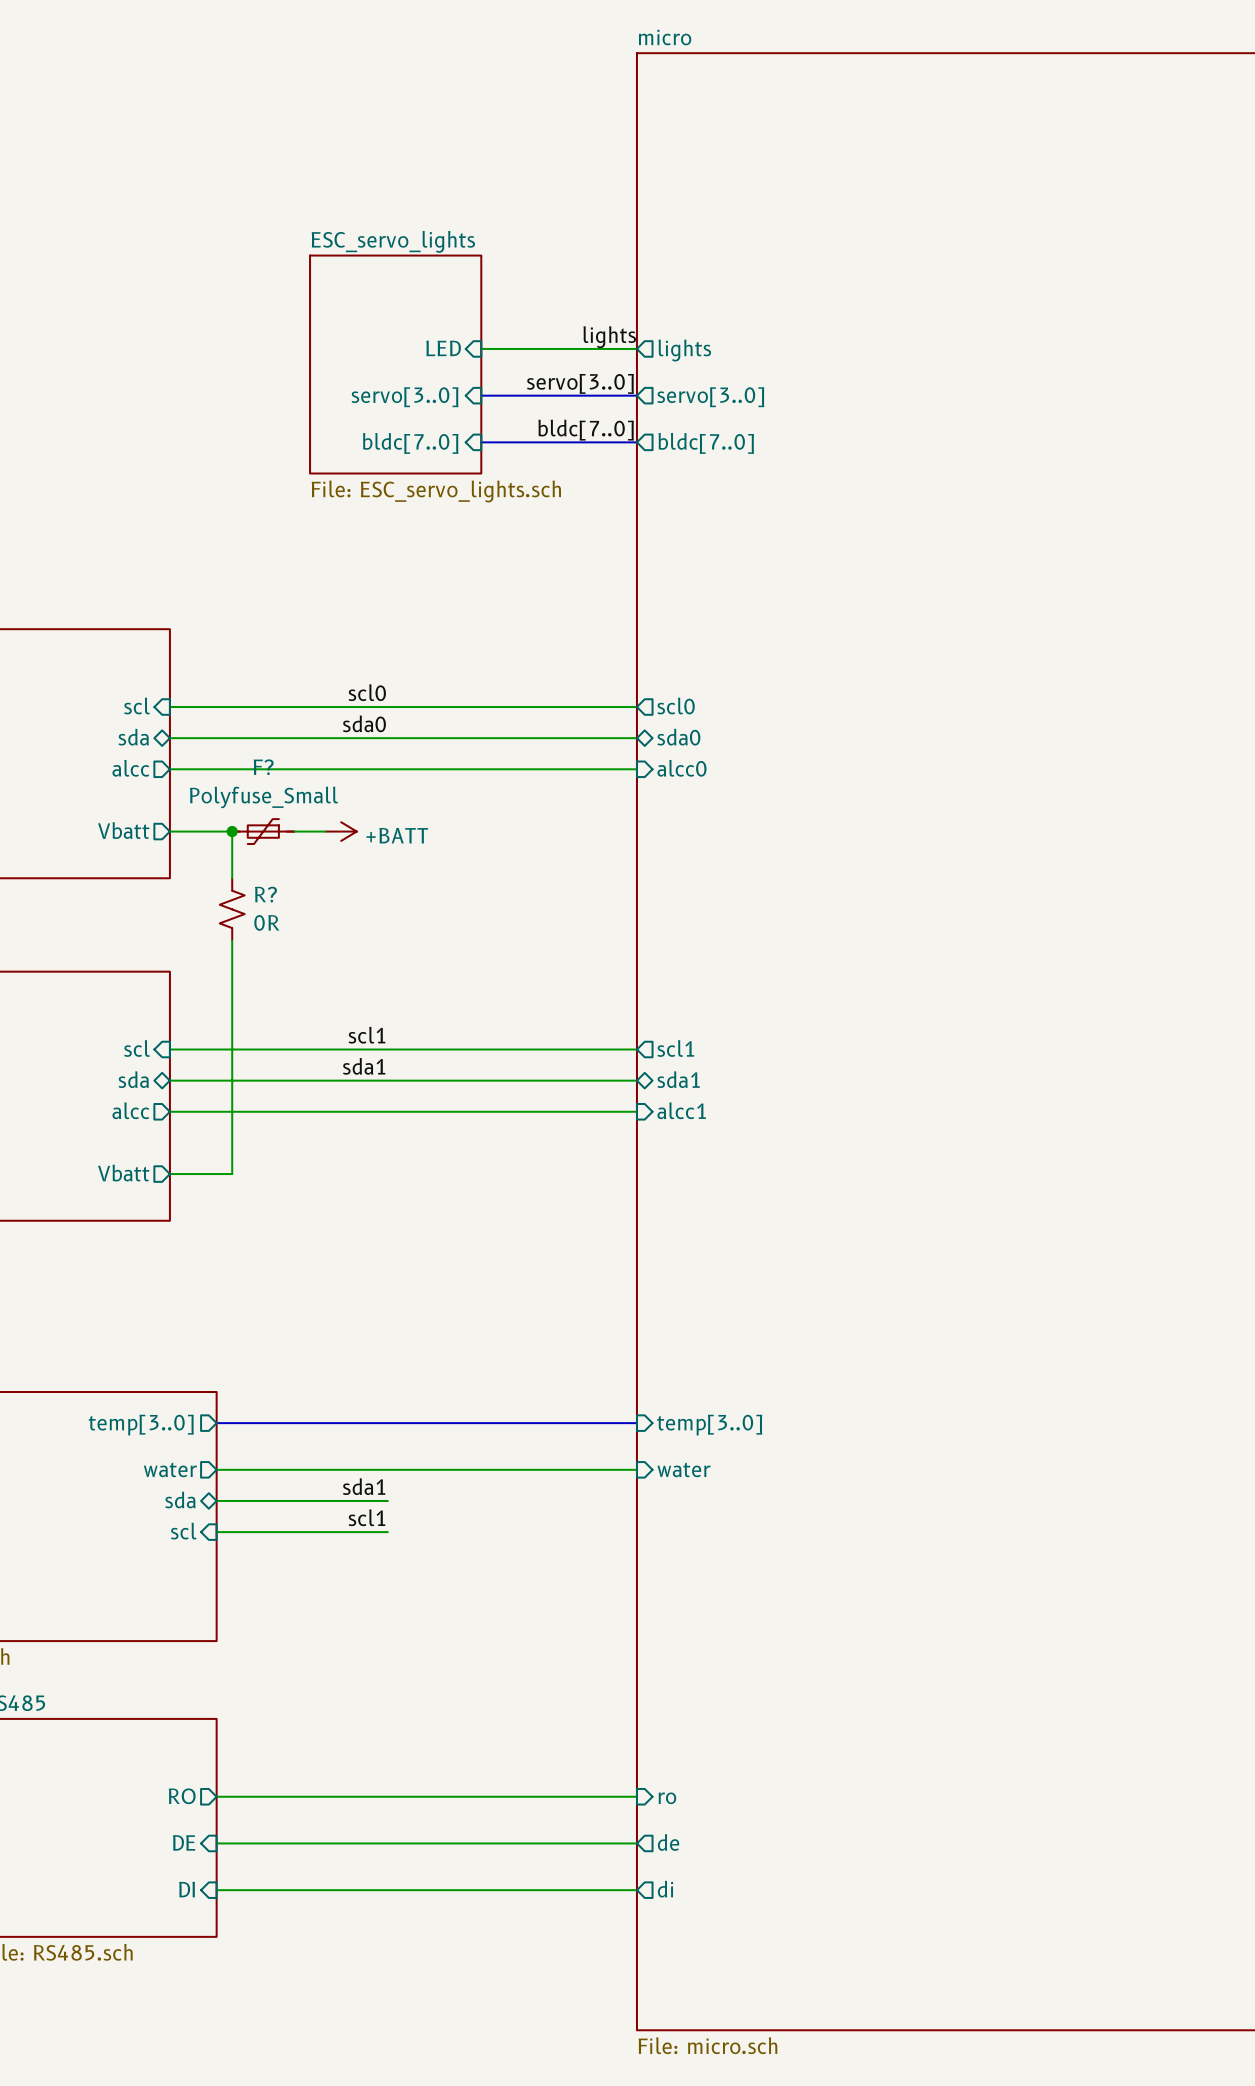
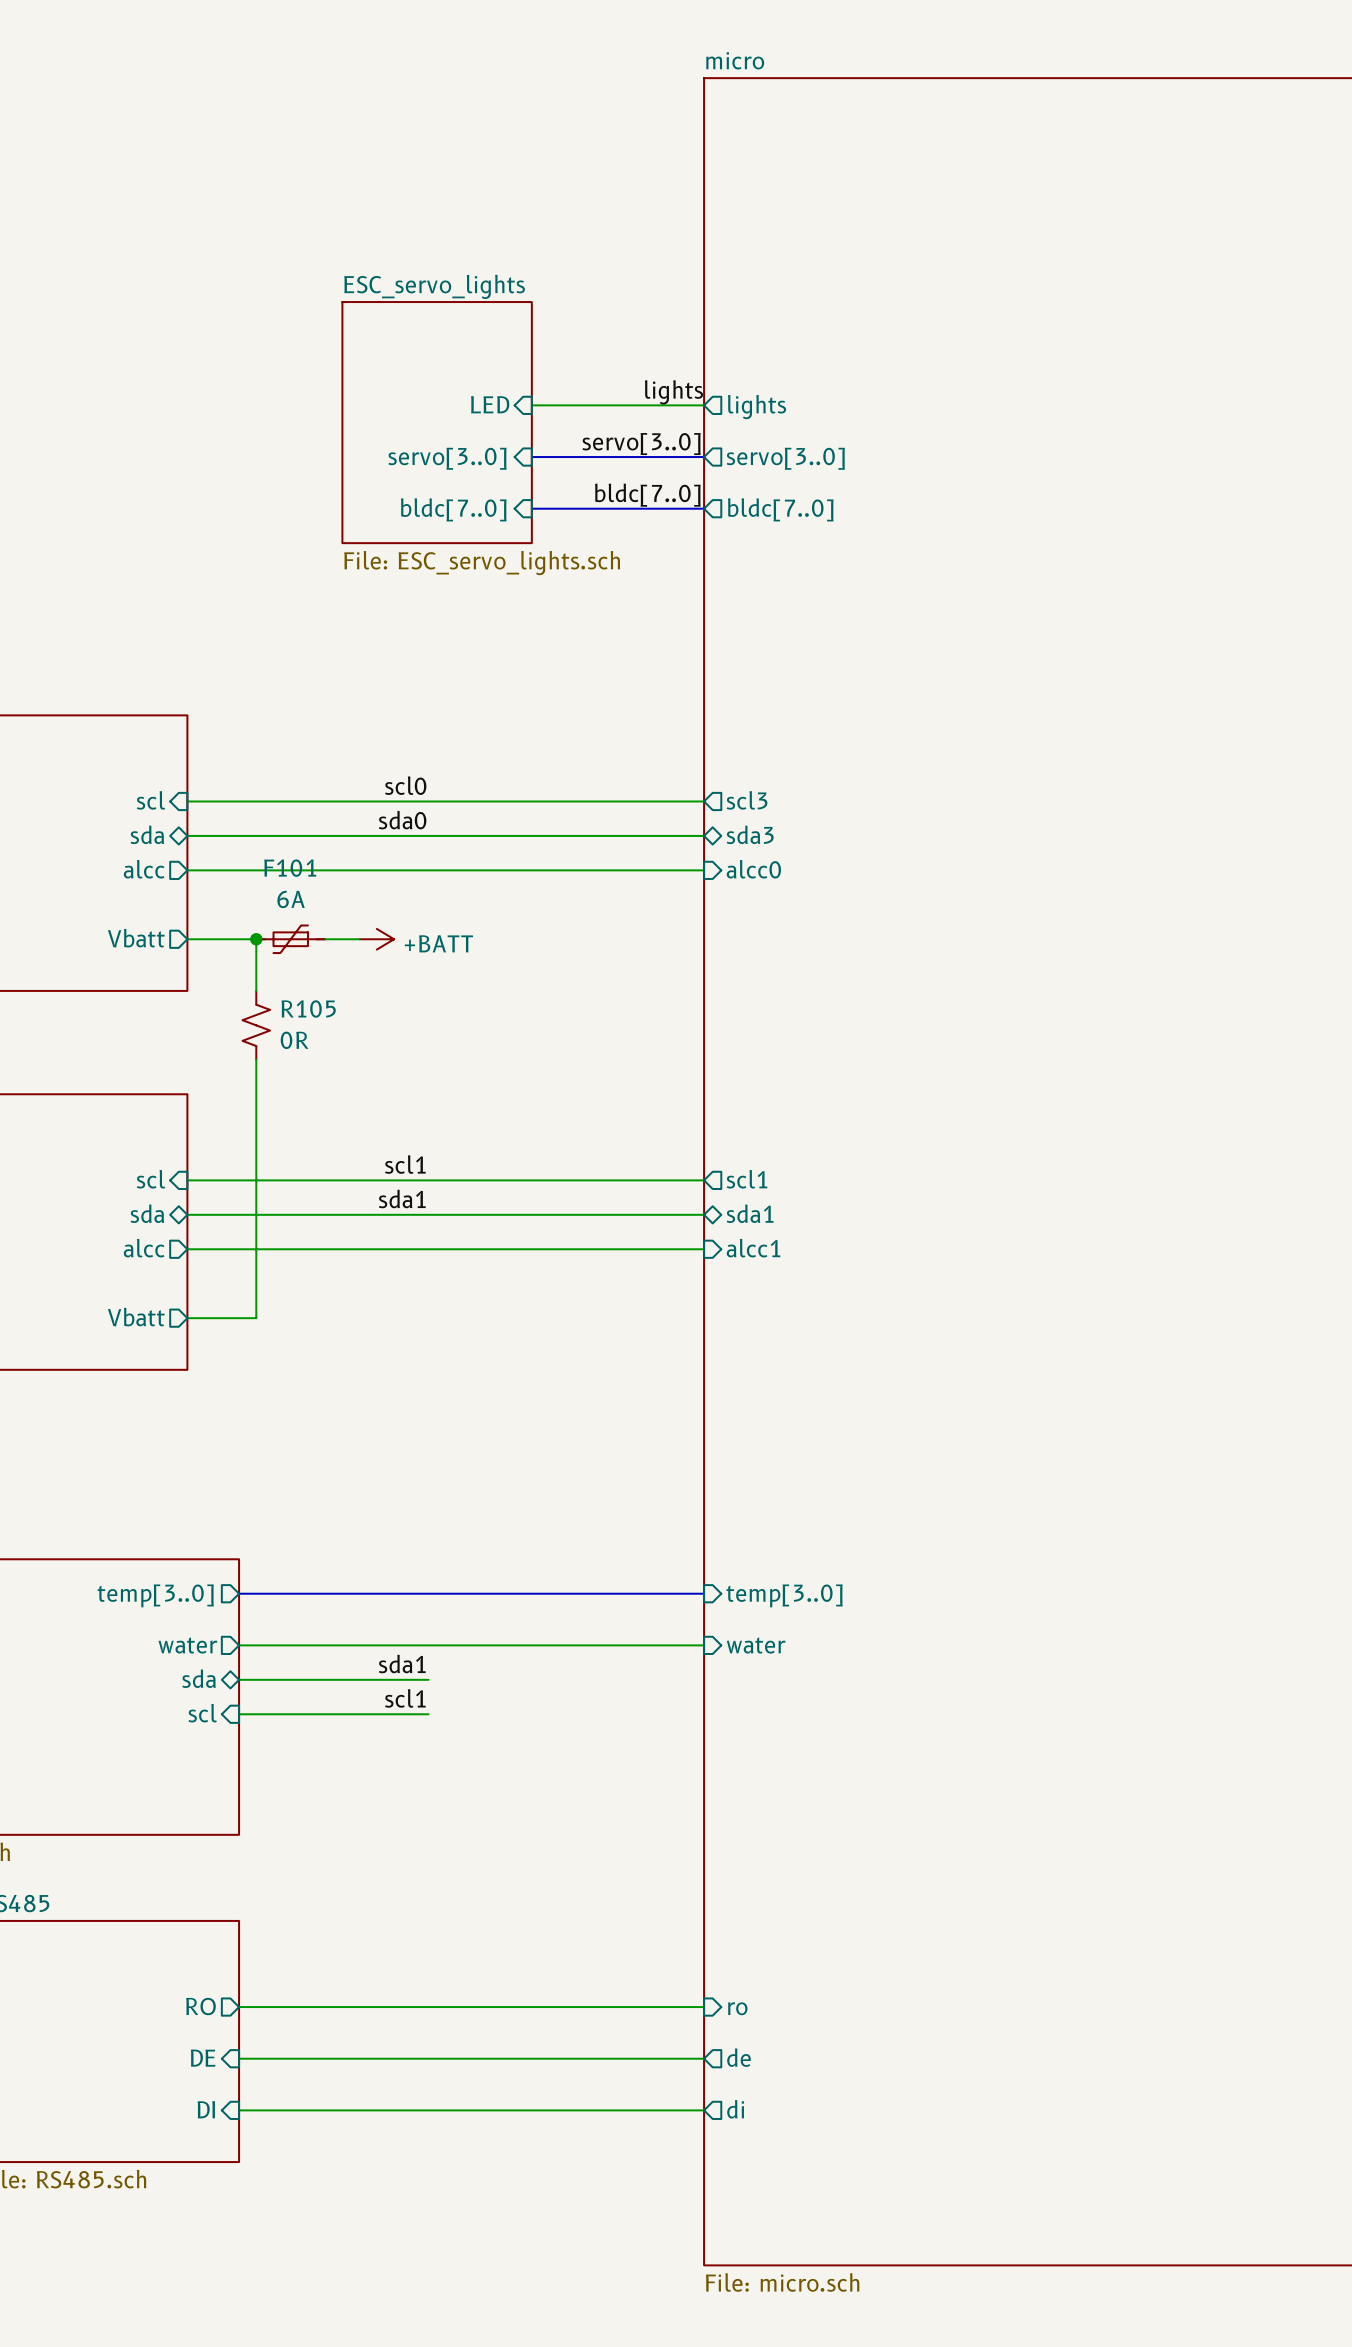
sheet pin: scl0 (676, 706) -> scl3 (747, 800)
sheet pin: sda0 (678, 737) -> sda3 (750, 834)
F? name: F? (263, 767) -> F101 (290, 868)
F? value: Polyfuse_Small (263, 797) -> 6A (291, 899)
R? name: R? (265, 894) -> R105 (308, 1008)

